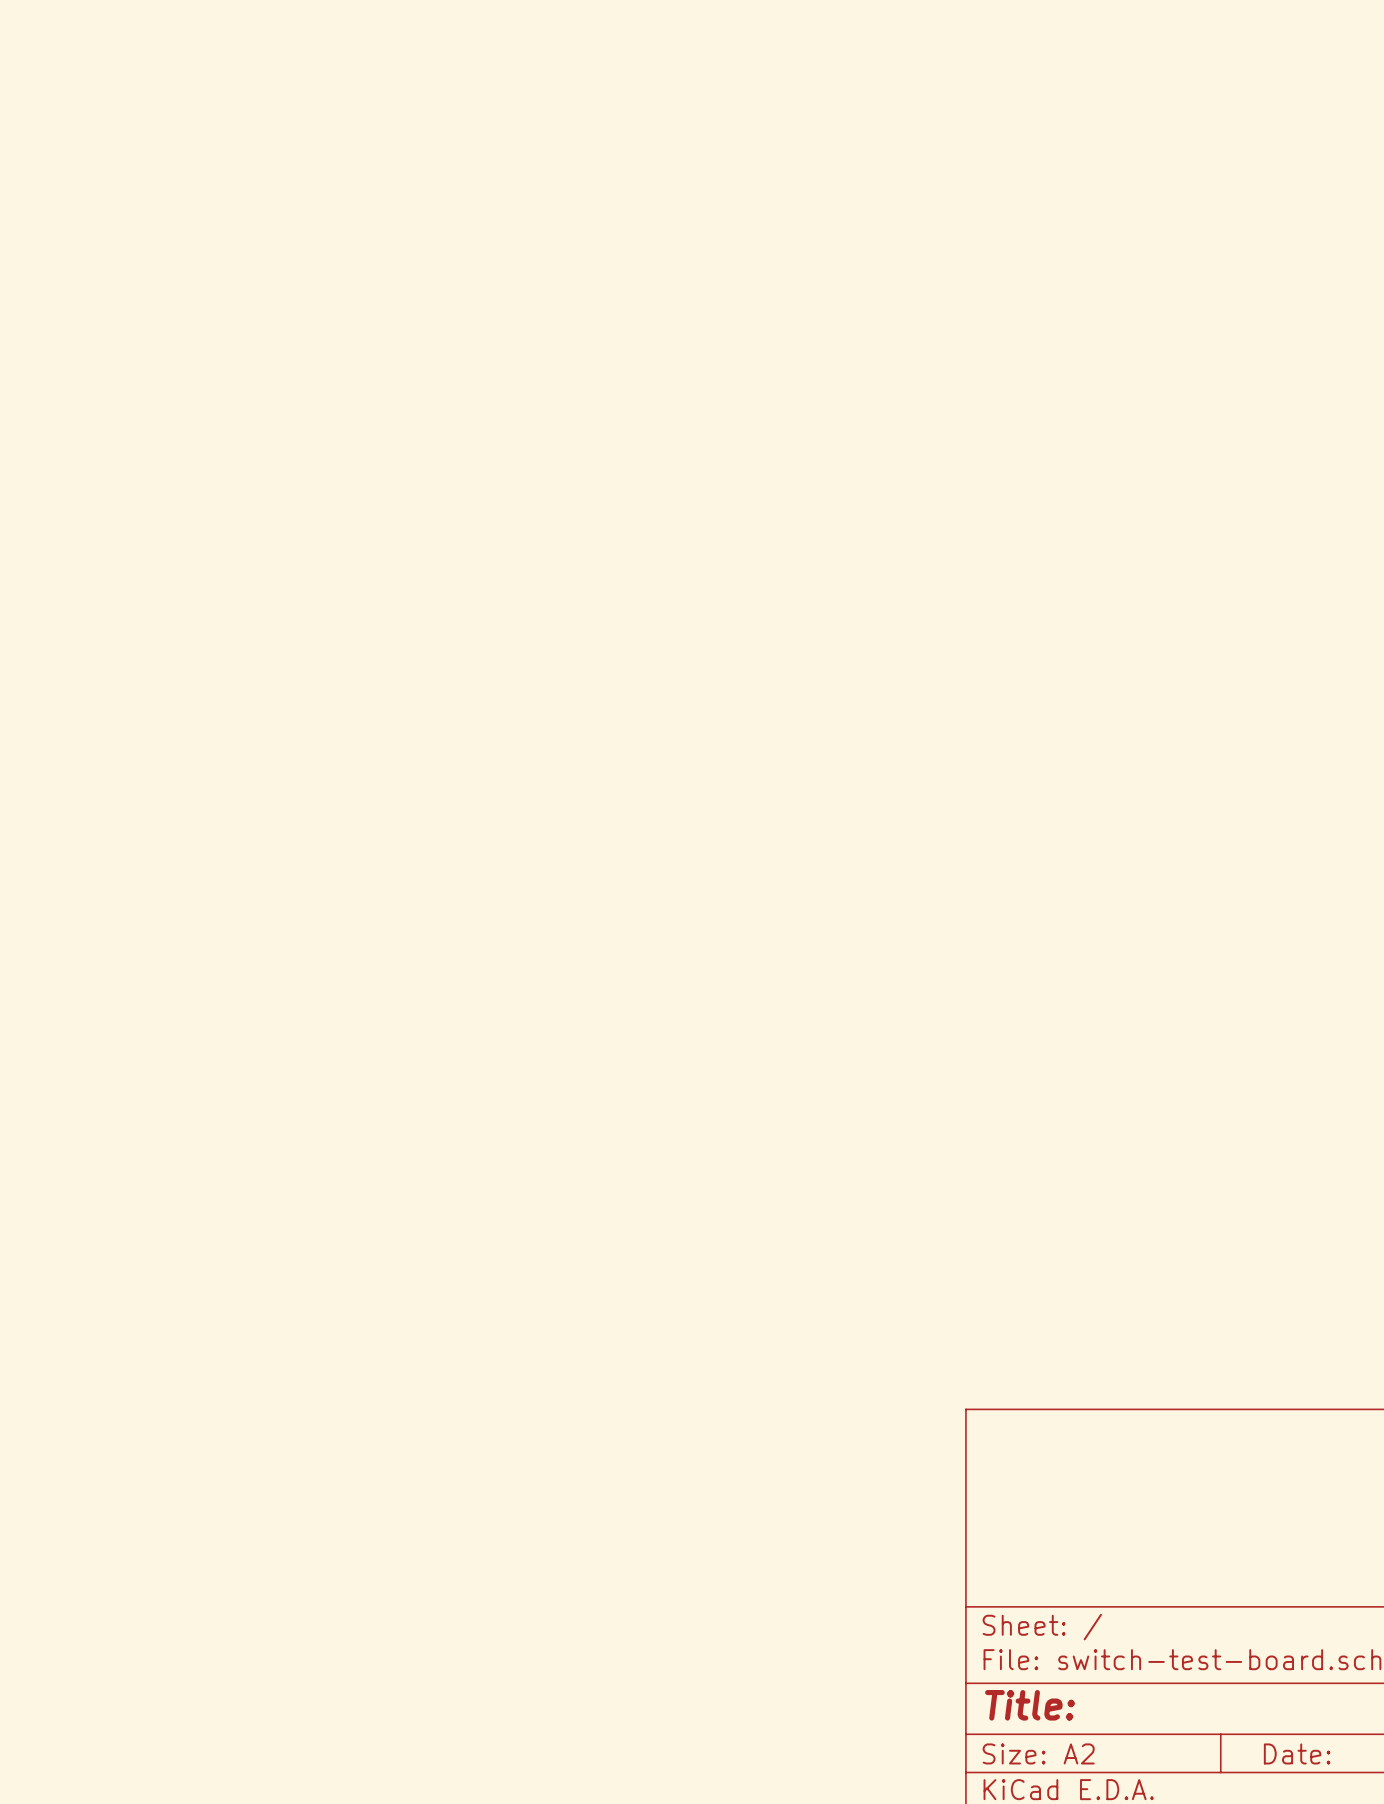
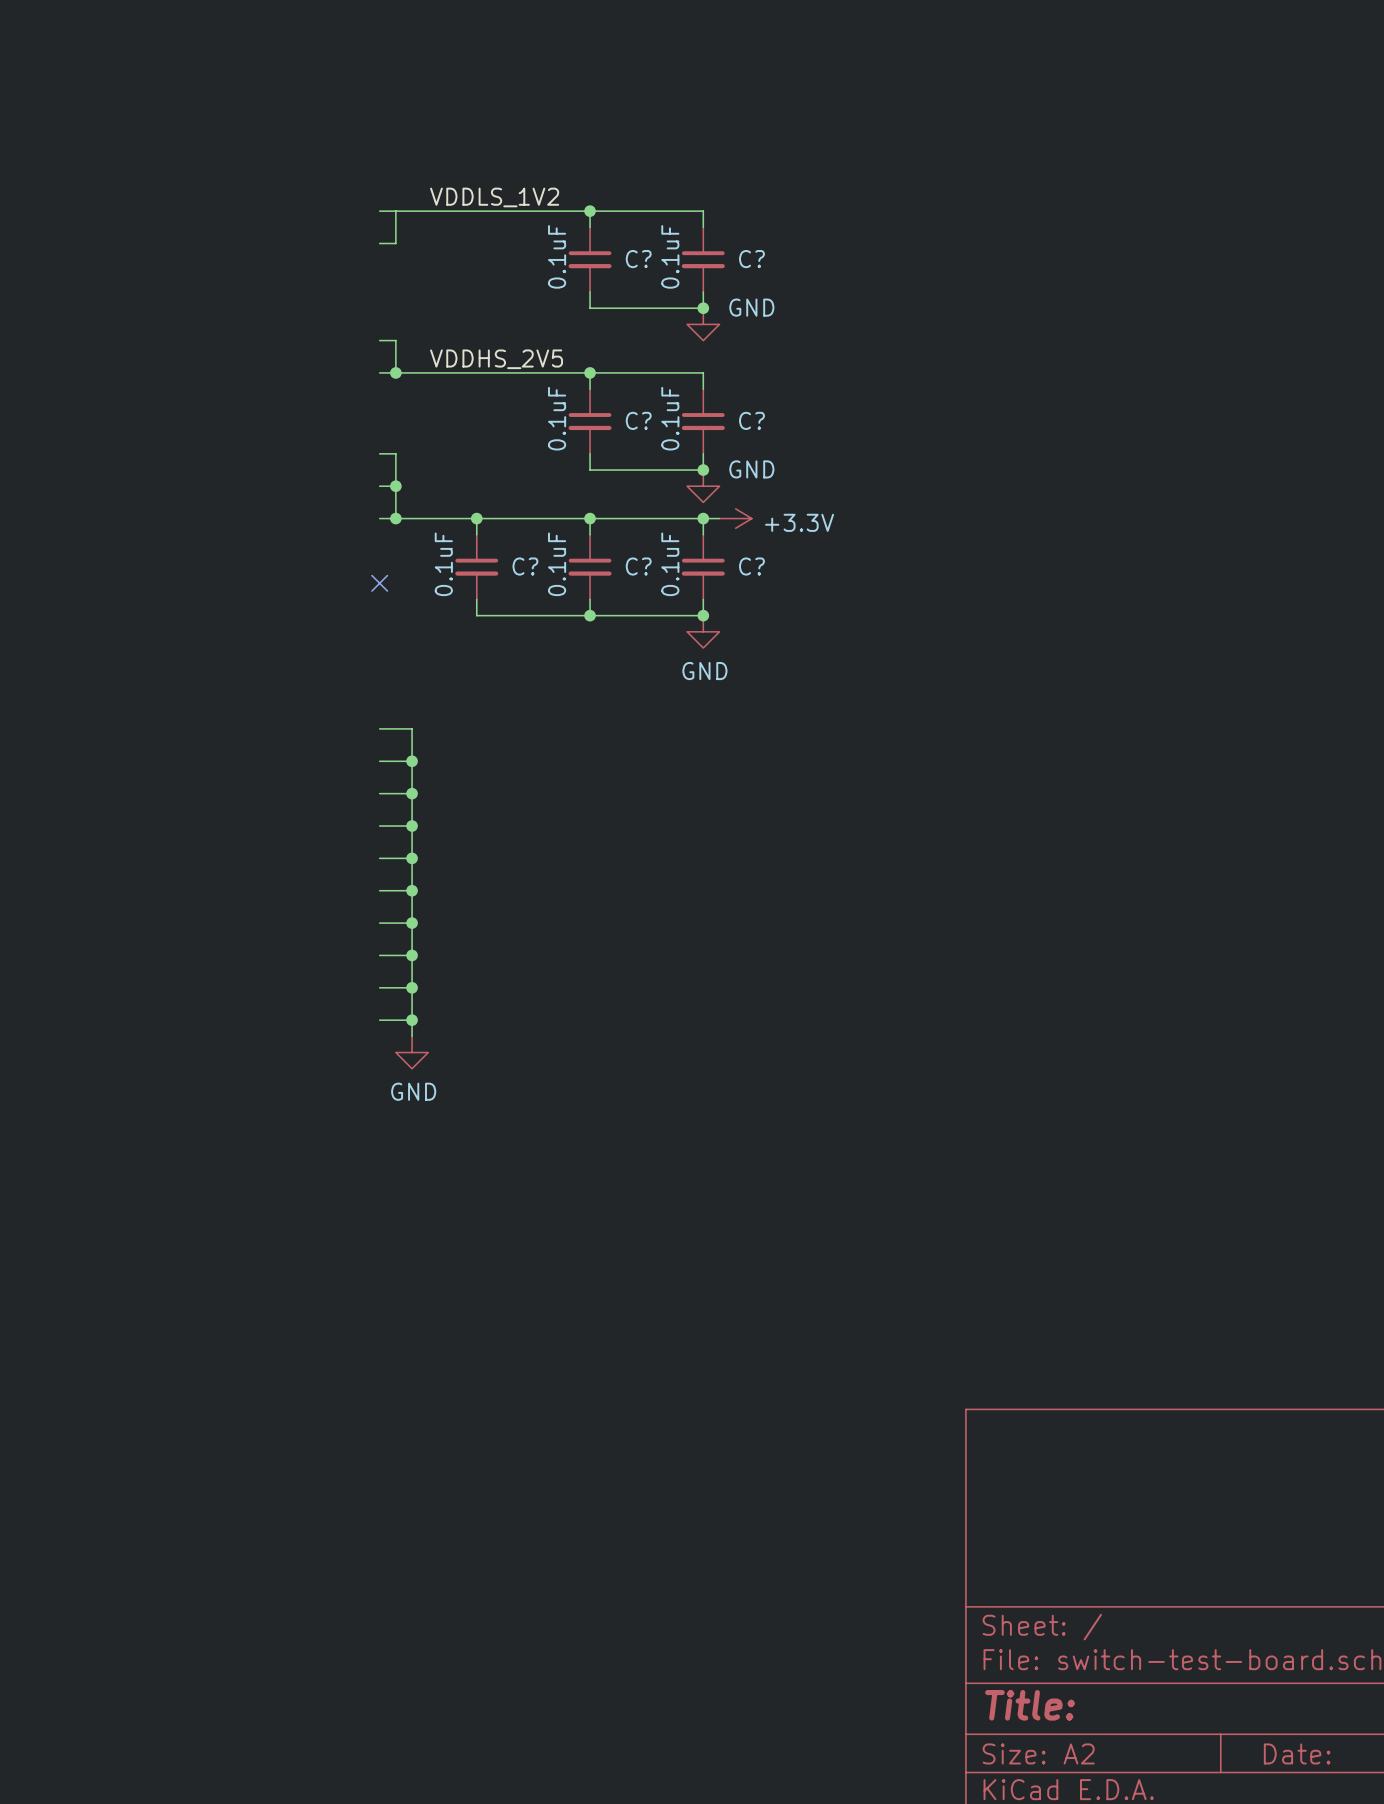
label: none -> VDDLS_1V2 (494, 197)
wire: none -> (379, 211) (703, 211) (703, 227)
wire: none -> (395, 211) (395, 243) (379, 243)
wire: none -> (590, 211) (590, 227)
junction: none -> (590, 211)
C?: none -> 0.1uF (590, 259)
C?: none -> 0.1uF (703, 259)
wire: none -> (590, 292) (590, 308) (703, 308) (703, 292)
junction: none -> (703, 308)
power symbol: none -> GND (703, 324)
wire: none -> (379, 340) (395, 340) (395, 372)
label: none -> VDDHS_2V5 (496, 359)
wire: none -> (379, 372) (703, 372) (703, 389)
junction: none -> (395, 372)
wire: none -> (590, 372) (590, 389)
junction: none -> (590, 372)
C?: none -> 0.1uF (590, 421)
C?: none -> 0.1uF (703, 421)
wire: none -> (379, 453) (395, 453) (395, 518)
wire: none -> (590, 453) (590, 470) (703, 470) (703, 453)
junction: none -> (703, 470)
wire: none -> (379, 486) (395, 486)
junction: none -> (395, 486)
power symbol: none -> GND (703, 486)
wire: none -> (379, 518) (719, 518)
junction: none -> (395, 518)
wire: none -> (476, 518) (476, 534)
junction: none -> (476, 518)
wire: none -> (590, 518) (590, 534)
junction: none -> (590, 518)
wire: none -> (703, 518) (703, 534)
junction: none -> (703, 518)
power symbol: none -> +3.3V (735, 518)
C?: none -> 0.1uF (476, 567)
C?: none -> 0.1uF (590, 567)
C?: none -> 0.1uF (703, 567)
no-connect mark: none -> (379, 583)
wire: none -> (476, 599) (476, 615) (703, 615) (703, 599)
wire: none -> (590, 599) (590, 615)
junction: none -> (590, 615)
junction: none -> (703, 615)
power symbol: none -> GND (703, 631)
wire: none -> (379, 728) (412, 728) (412, 1036)
wire: none -> (379, 761) (412, 761)
junction: none -> (412, 761)
wire: none -> (379, 793) (412, 793)
junction: none -> (412, 793)
wire: none -> (379, 826) (412, 826)
junction: none -> (412, 826)
wire: none -> (379, 858) (412, 858)
junction: none -> (412, 858)
wire: none -> (379, 890) (412, 890)
junction: none -> (412, 890)
wire: none -> (379, 923) (412, 923)
junction: none -> (412, 923)
wire: none -> (379, 955) (412, 955)
junction: none -> (412, 955)
wire: none -> (379, 987) (412, 987)
junction: none -> (412, 987)
wire: none -> (379, 1020) (412, 1020)
junction: none -> (412, 1020)
power symbol: none -> GND (412, 1052)

